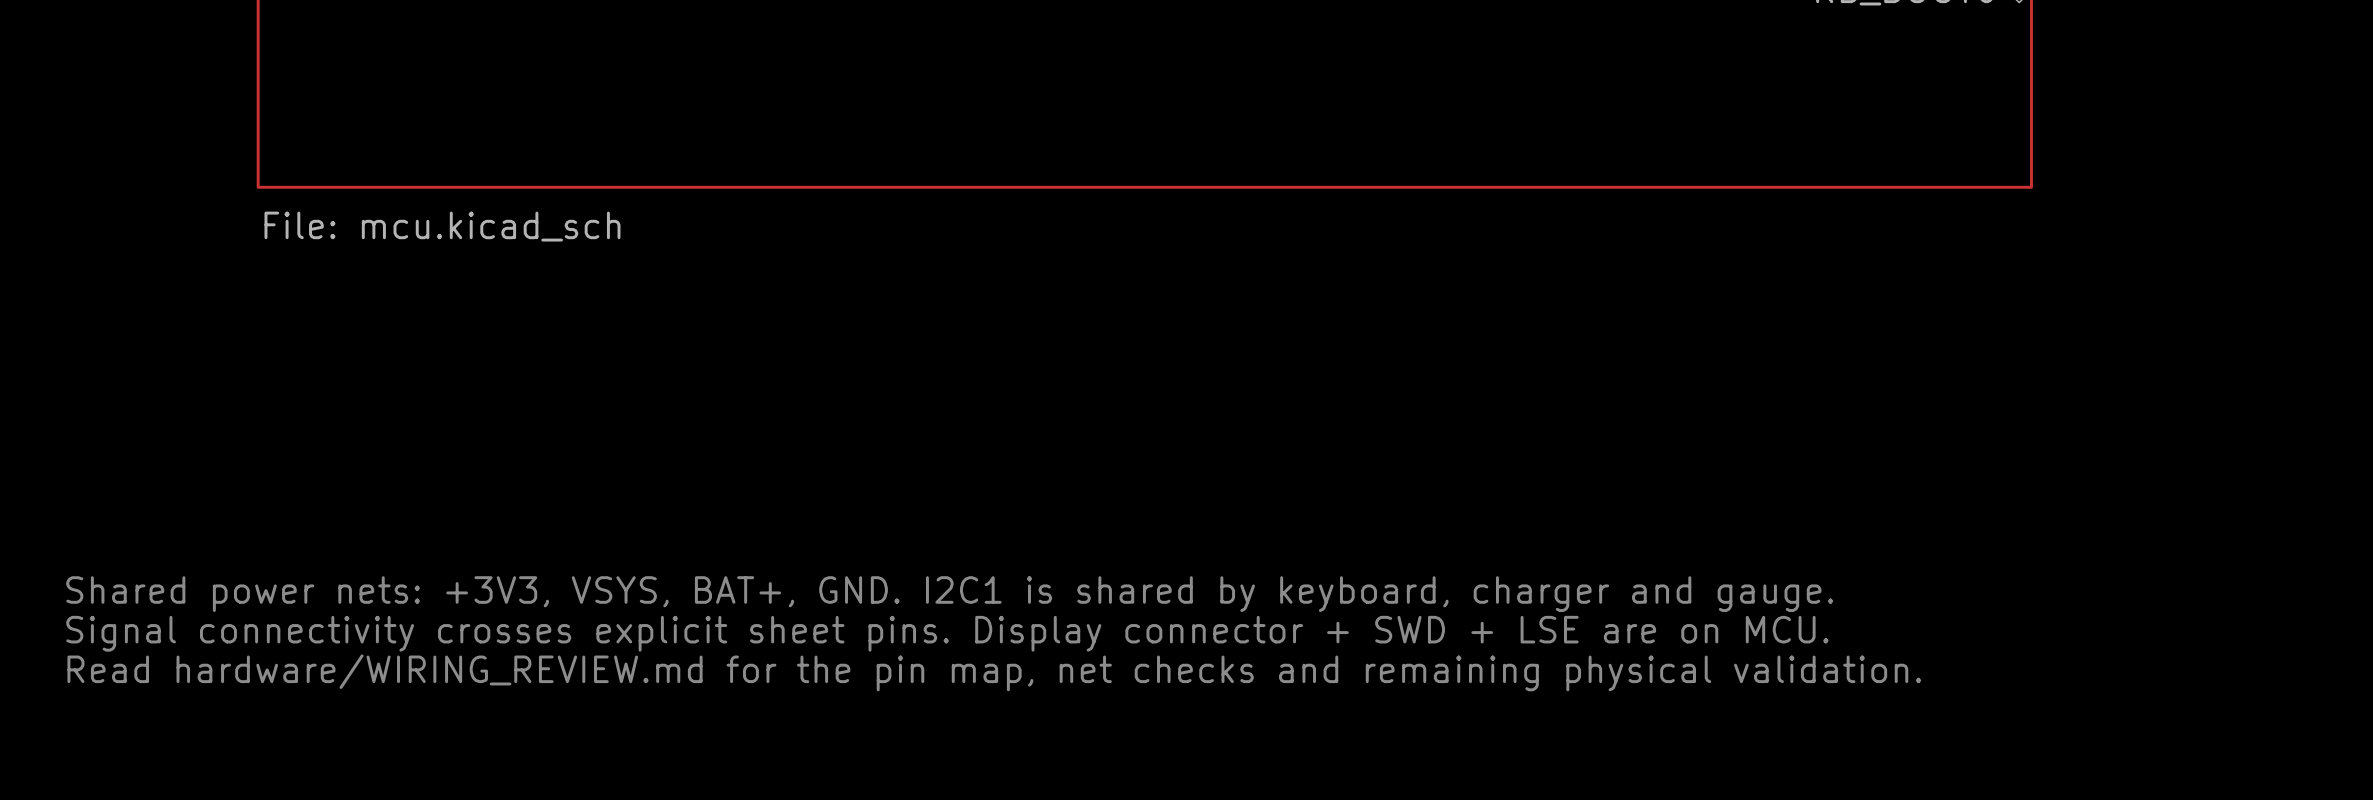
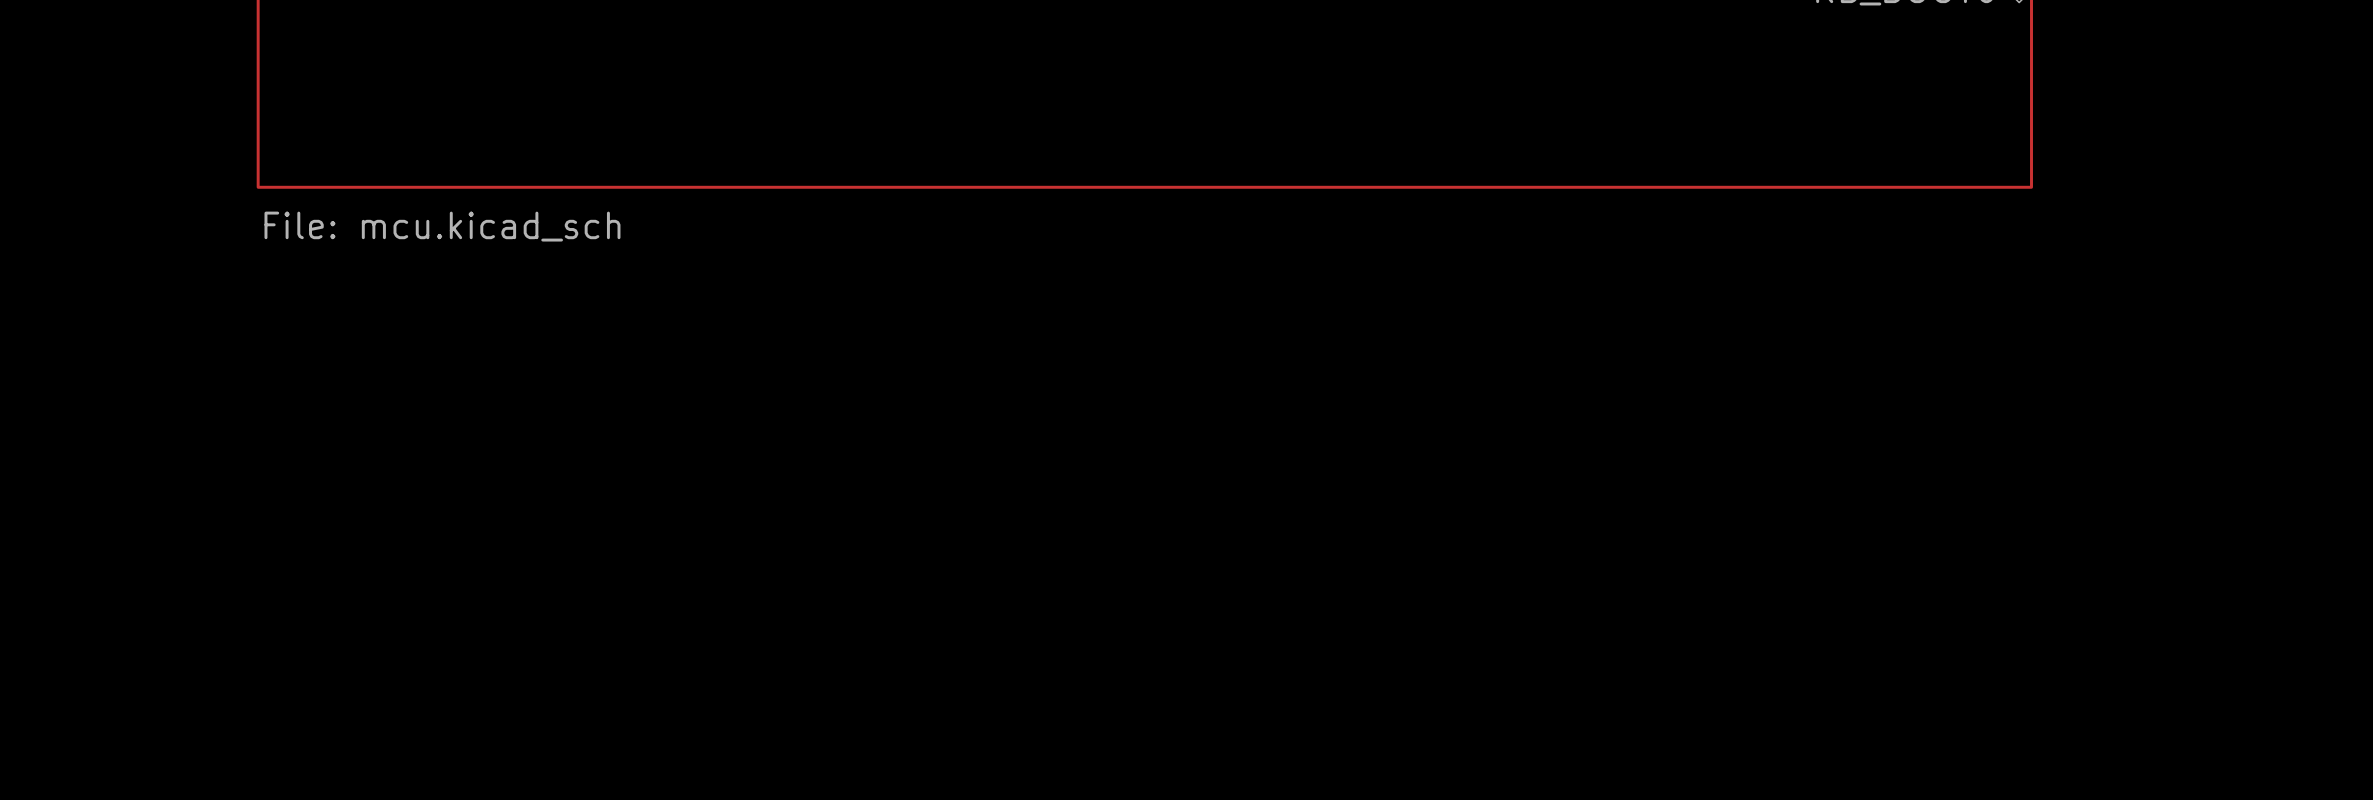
text: Shared power nets: +3V3, VSYS, BAT+, GND. I2C1 is shared by keyboard, charger and gauge. (949, 594) -> none
text: Signal connectivity crosses explicit sheet pins. Display connector + SWD + LSE are on MCU. (947, 633) -> none
text: Read hardware/WIRING_REVIEW.md for the pin map, net checks and remaining physical validation. (994, 672) -> none

